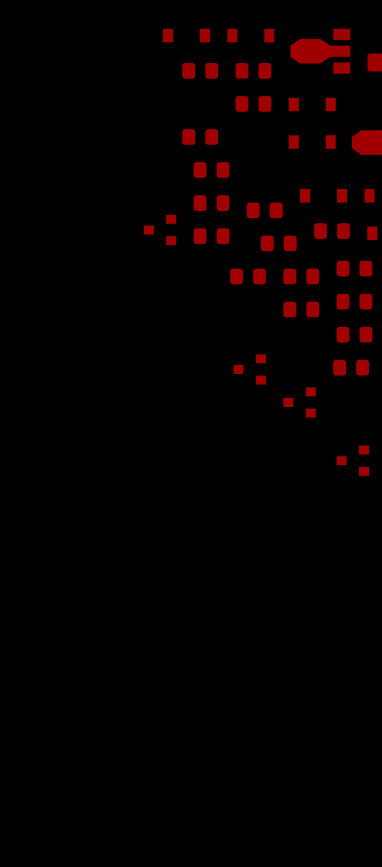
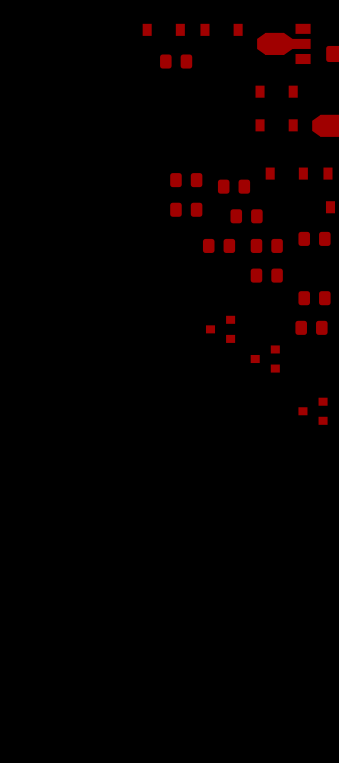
part: (253, 70) -> none
part: (253, 103) -> none
part: (200, 136) -> none
part: (211, 170) -> none
part: (159, 229) -> none
part: (331, 231) -> none
part: (354, 301) -> none

